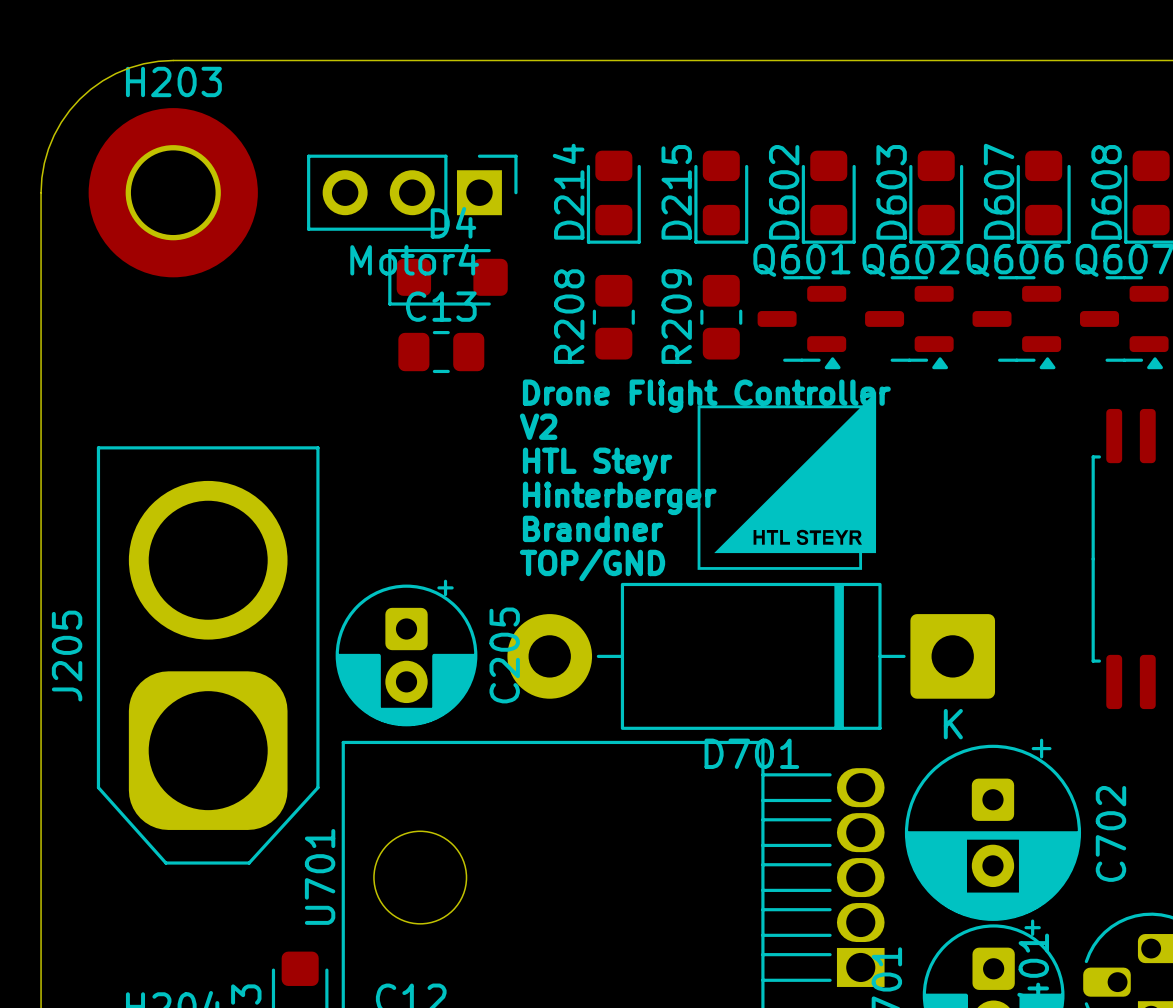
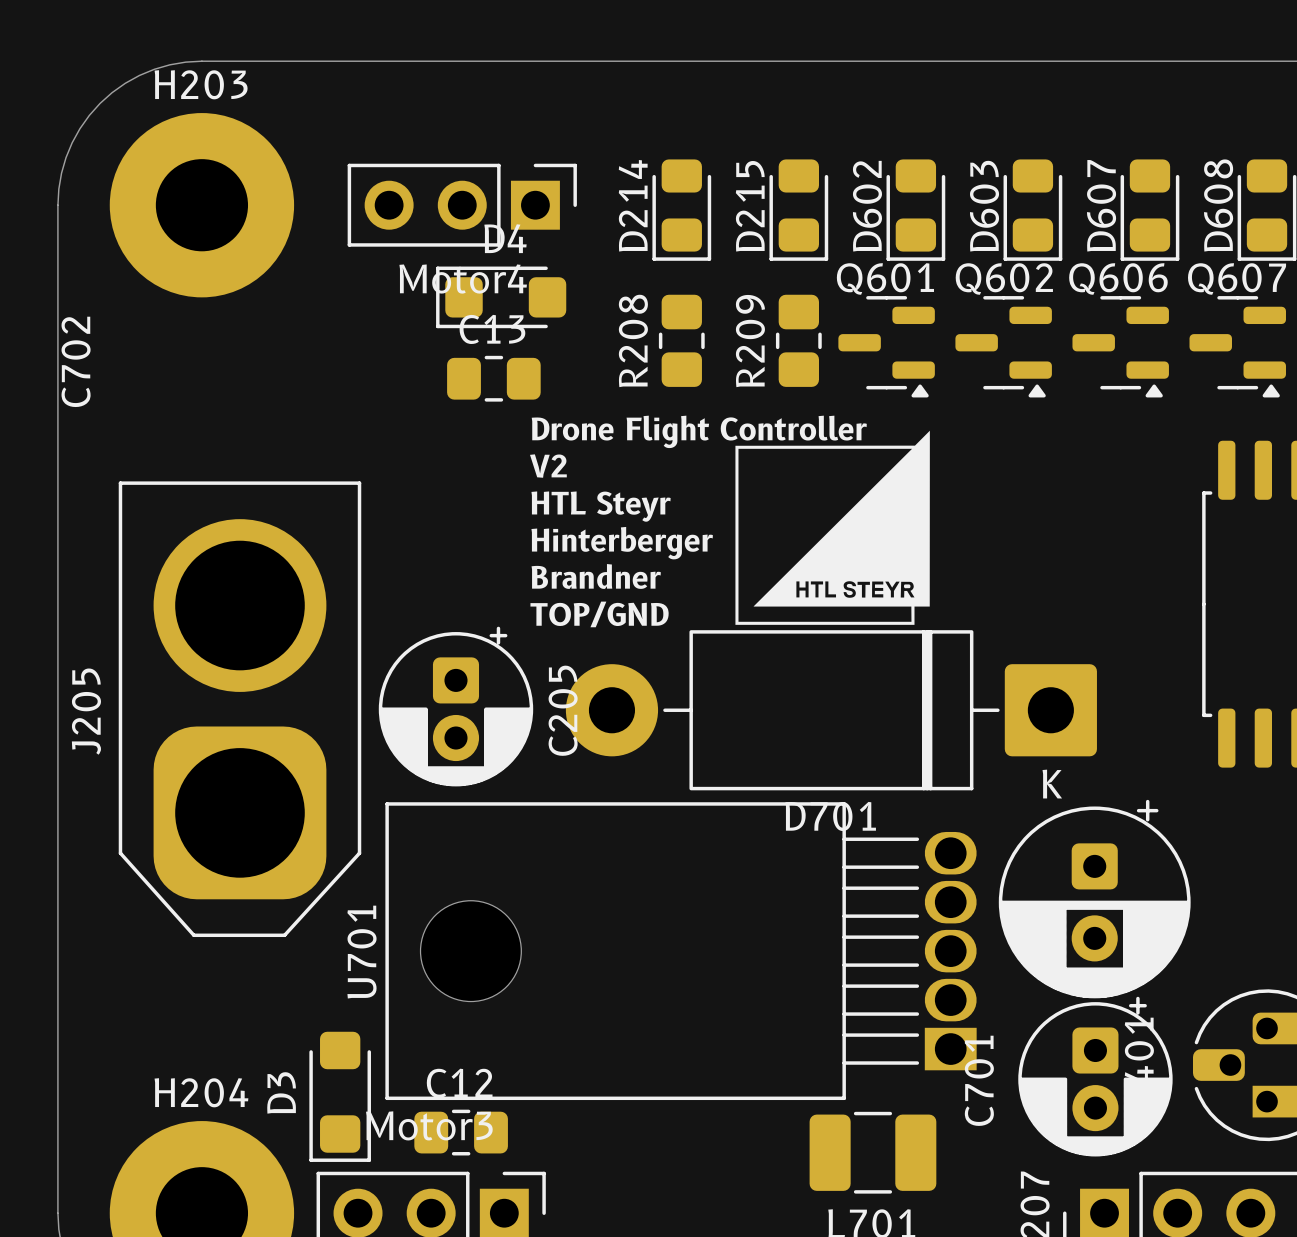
text position: Drone Flight Controller (706, 396) -> Drone Flight Controller (699, 431)
text position: V2 (538, 426) -> V2 (548, 466)
text position: HTL Steyr (597, 464) -> HTL Steyr (601, 506)
drawing position: (786, 480) -> (832, 527)
text position: Hinterberger (619, 498) -> Hinterberger (622, 543)
text position: Brandner (593, 528) -> Brandner (596, 576)
drawing position: (855, 534) -> (907, 586)
text position: TOP/GND (592, 564) -> TOP/GND (599, 614)
C702 name position: C702 (1110, 833) -> C702 (76, 361)

